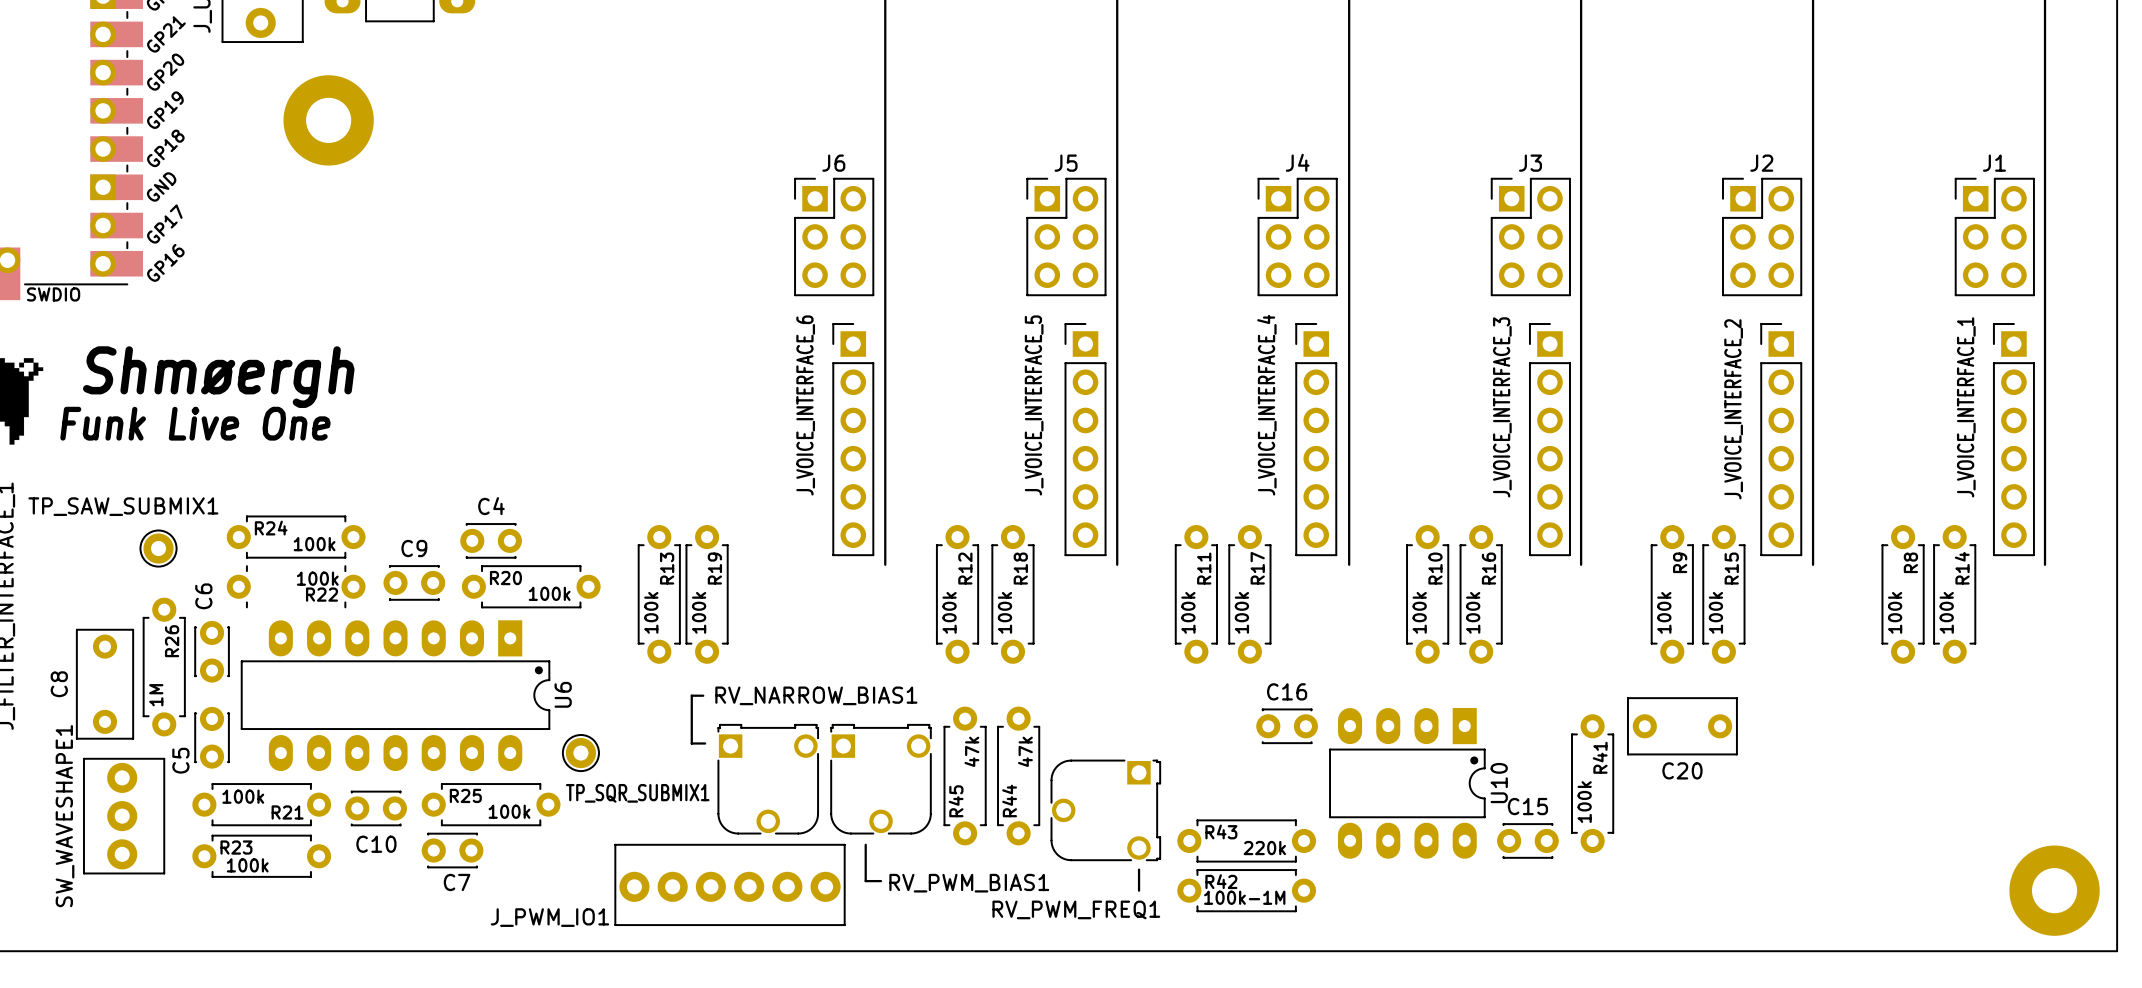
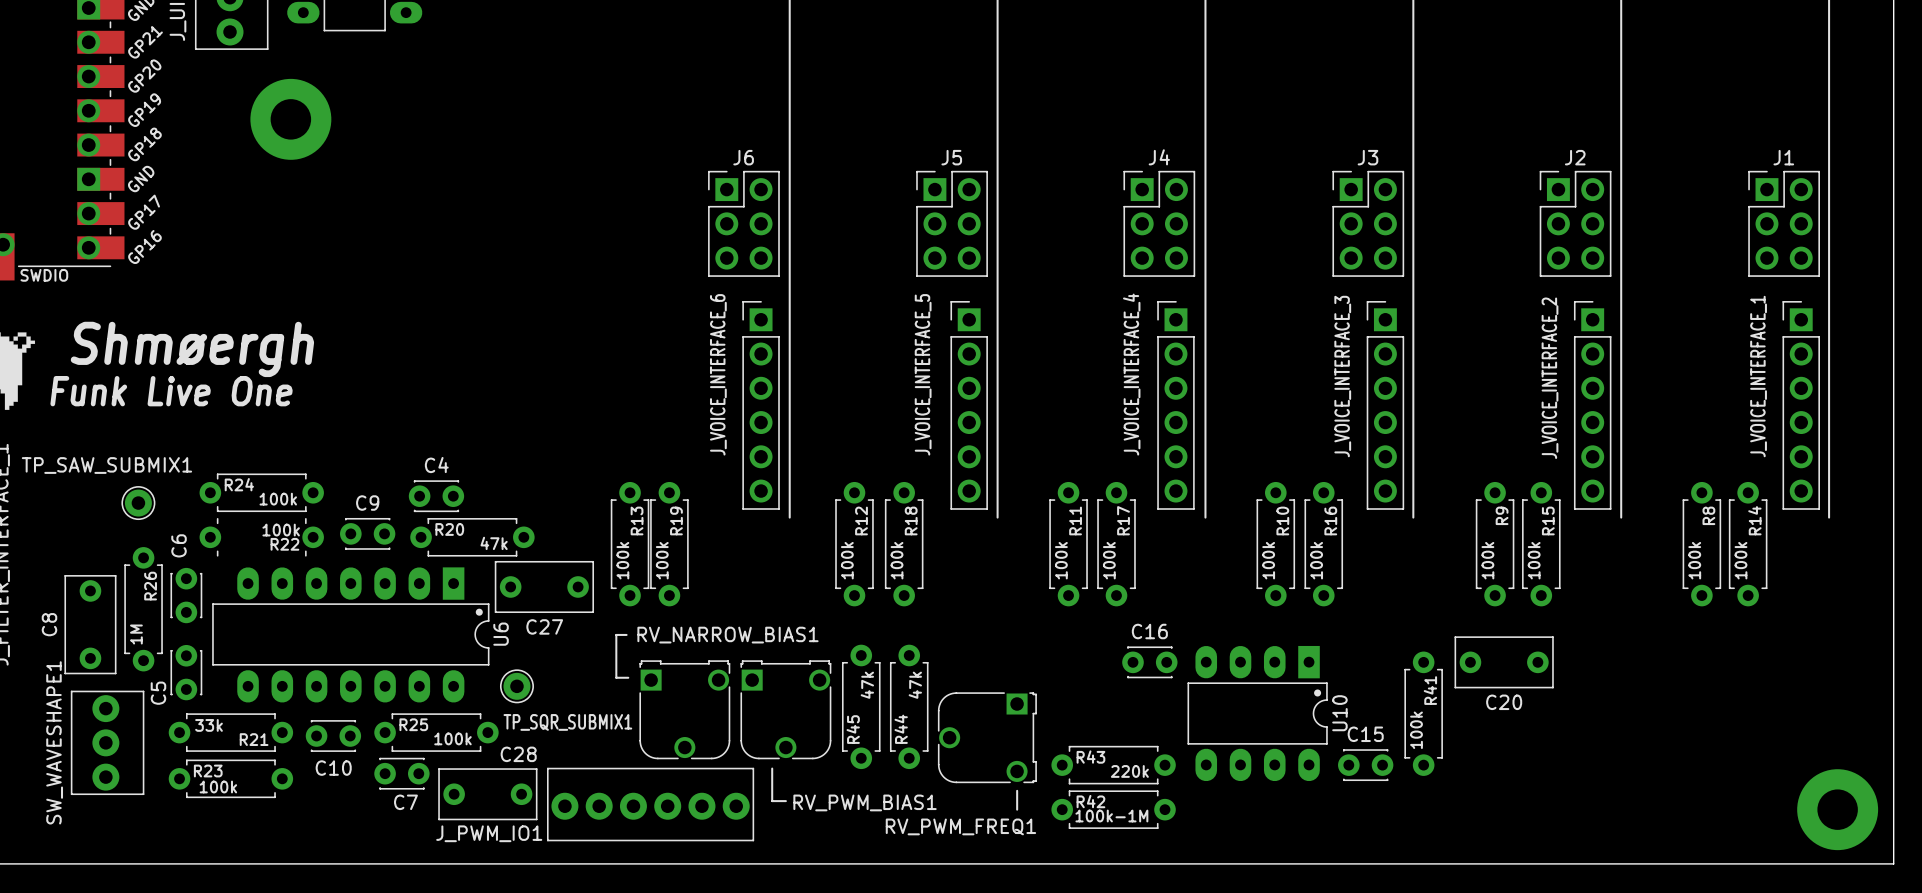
R19 name: R19 (714, 568) -> R13 (637, 520)
R20 value: 100k (549, 593) -> 47k (494, 543)
R13: 100k (659, 594) -> none
R19: none -> 100k (669, 544)
C27: none -> (544, 586)
R21 value: 100k (243, 796) -> 33k (209, 725)
C28: none -> (487, 794)

